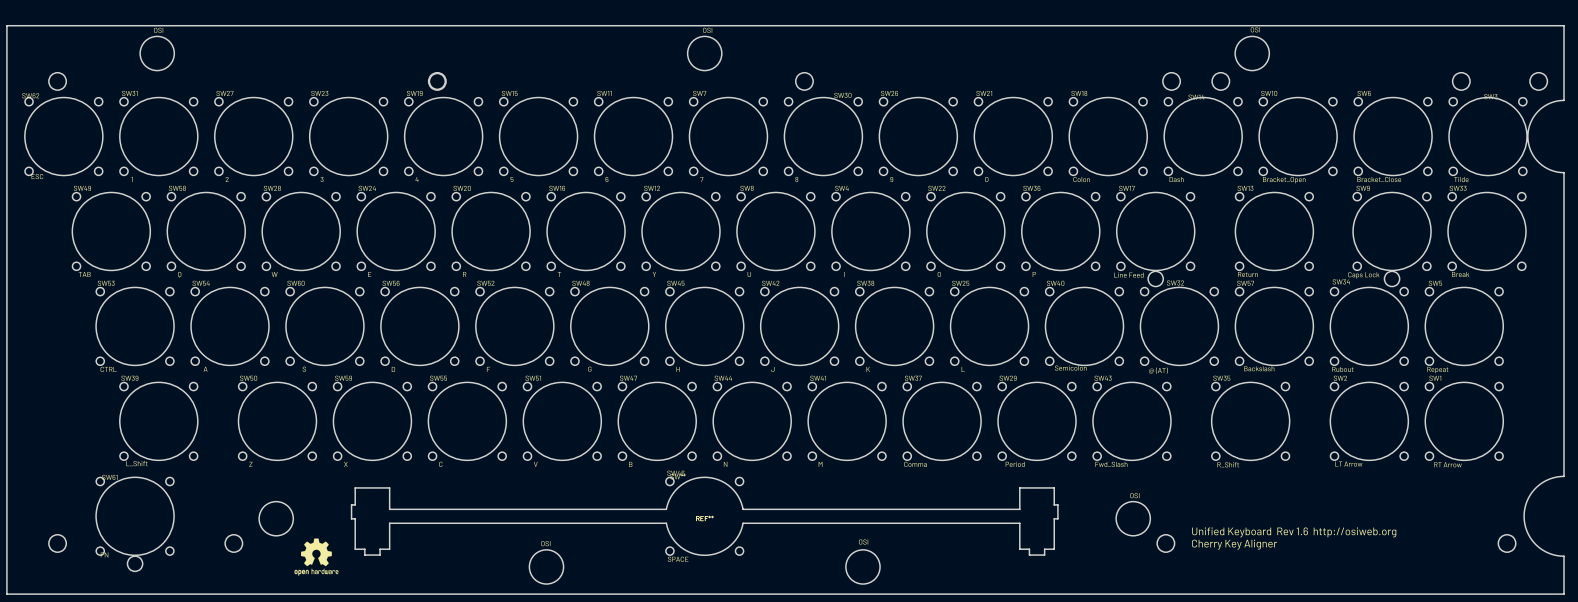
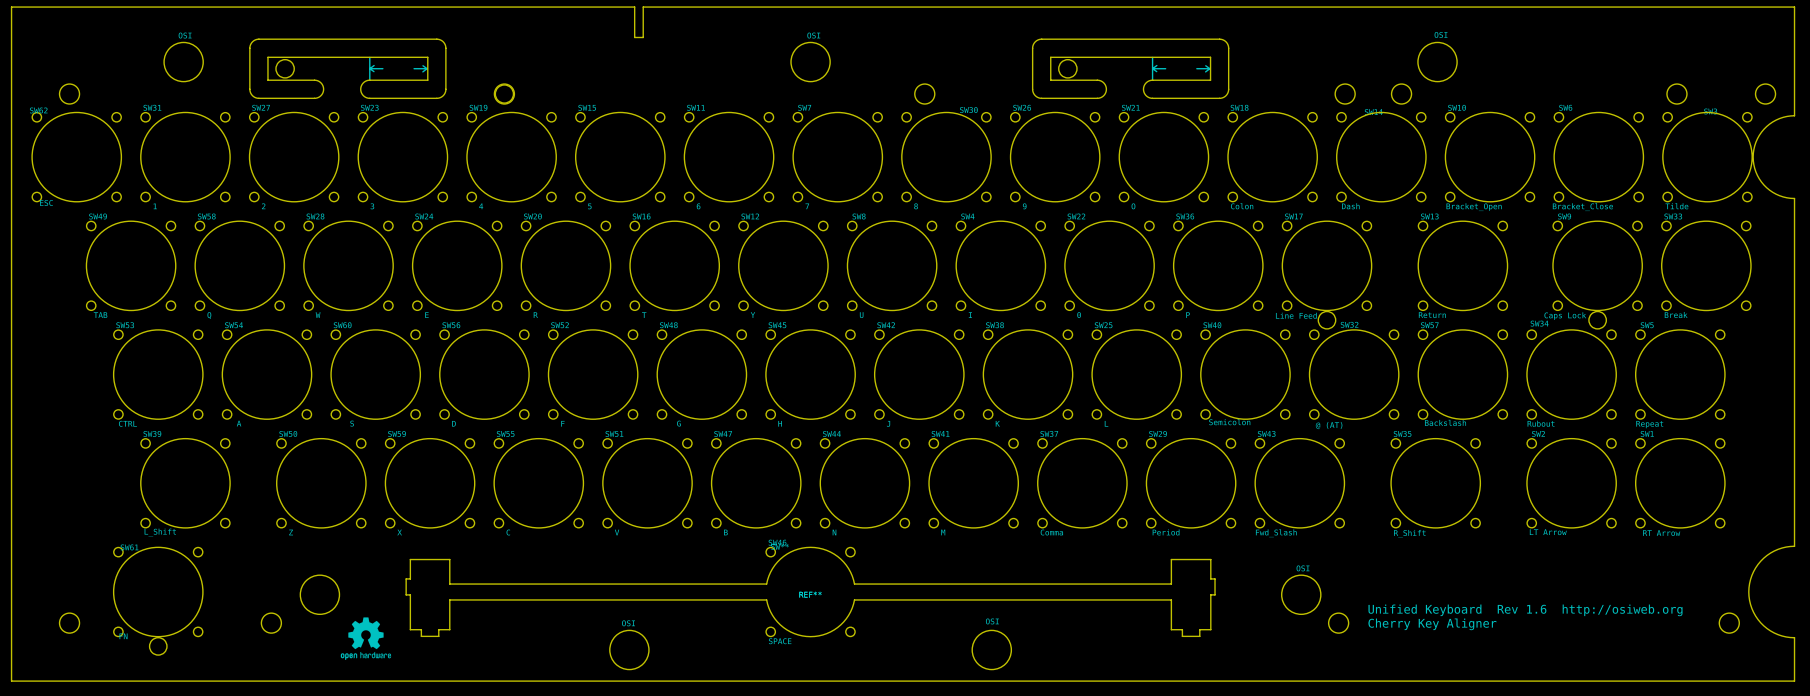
board edge: (6, 25) (1564, 25) -> (11, 30) (11, 7) (634, 7) (634, 37) (643, 37) (643, 7) (1794, 7) (1794, 30)
board edge: none -> (258, 39) (439, 39) (443, 41) (445, 47) (445, 91) (442, 96) (436, 98) (369, 98) (361, 93) (361, 85) (367, 80) (427, 80) (427, 57) (267, 57) (267, 80) (316, 80) (322, 84) (323, 91) (320, 95) (315, 98) (256, 98) (251, 94) (249, 90) (249, 48) (252, 41) (258, 39)
board edge: none -> (1041, 39) (1221, 39) (1226, 41) (1228, 47) (1228, 91) (1225, 96) (1219, 98) (1152, 98) (1144, 93) (1144, 85) (1150, 80) (1210, 80) (1210, 57) (1050, 57) (1050, 80) (1099, 80) (1105, 84) (1106, 91) (1103, 95) (1098, 98) (1039, 98) (1035, 95) (1032, 90) (1032, 48) (1035, 41) (1041, 39)
line: none -> (369, 57) (369, 80)
line: none -> (1152, 57) (1152, 80)
round board edge: none -> [275, 59, 295, 79]
round board edge: none -> [1058, 59, 1078, 79]
line: none -> (374, 65) (369, 68)
line: none -> (422, 65) (427, 68)
line: none -> (1156, 65) (1152, 68)
line: none -> (1205, 65) (1209, 68)
line: none -> (369, 68) (382, 68)
line: none -> (369, 68) (373, 71)
line: none -> (414, 68) (427, 68) (422, 71)
line: none -> (1152, 68) (1165, 68)
line: none -> (1152, 68) (1156, 71)
line: none -> (1196, 68) (1209, 68) (1205, 71)

